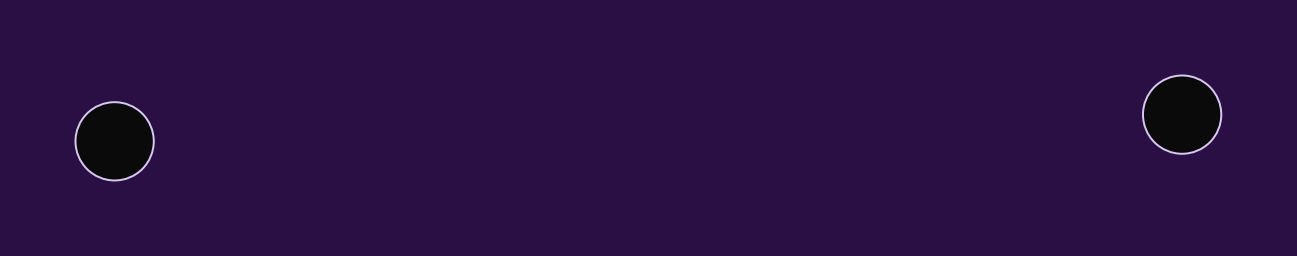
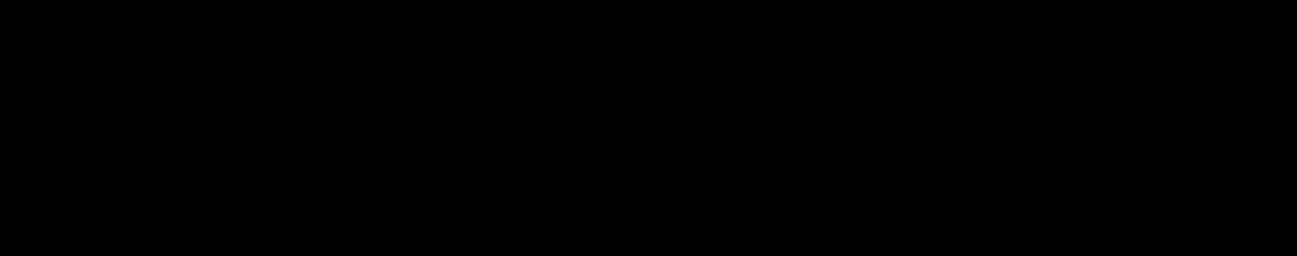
part: (1182, 114) -> none
part: (114, 141) -> none

